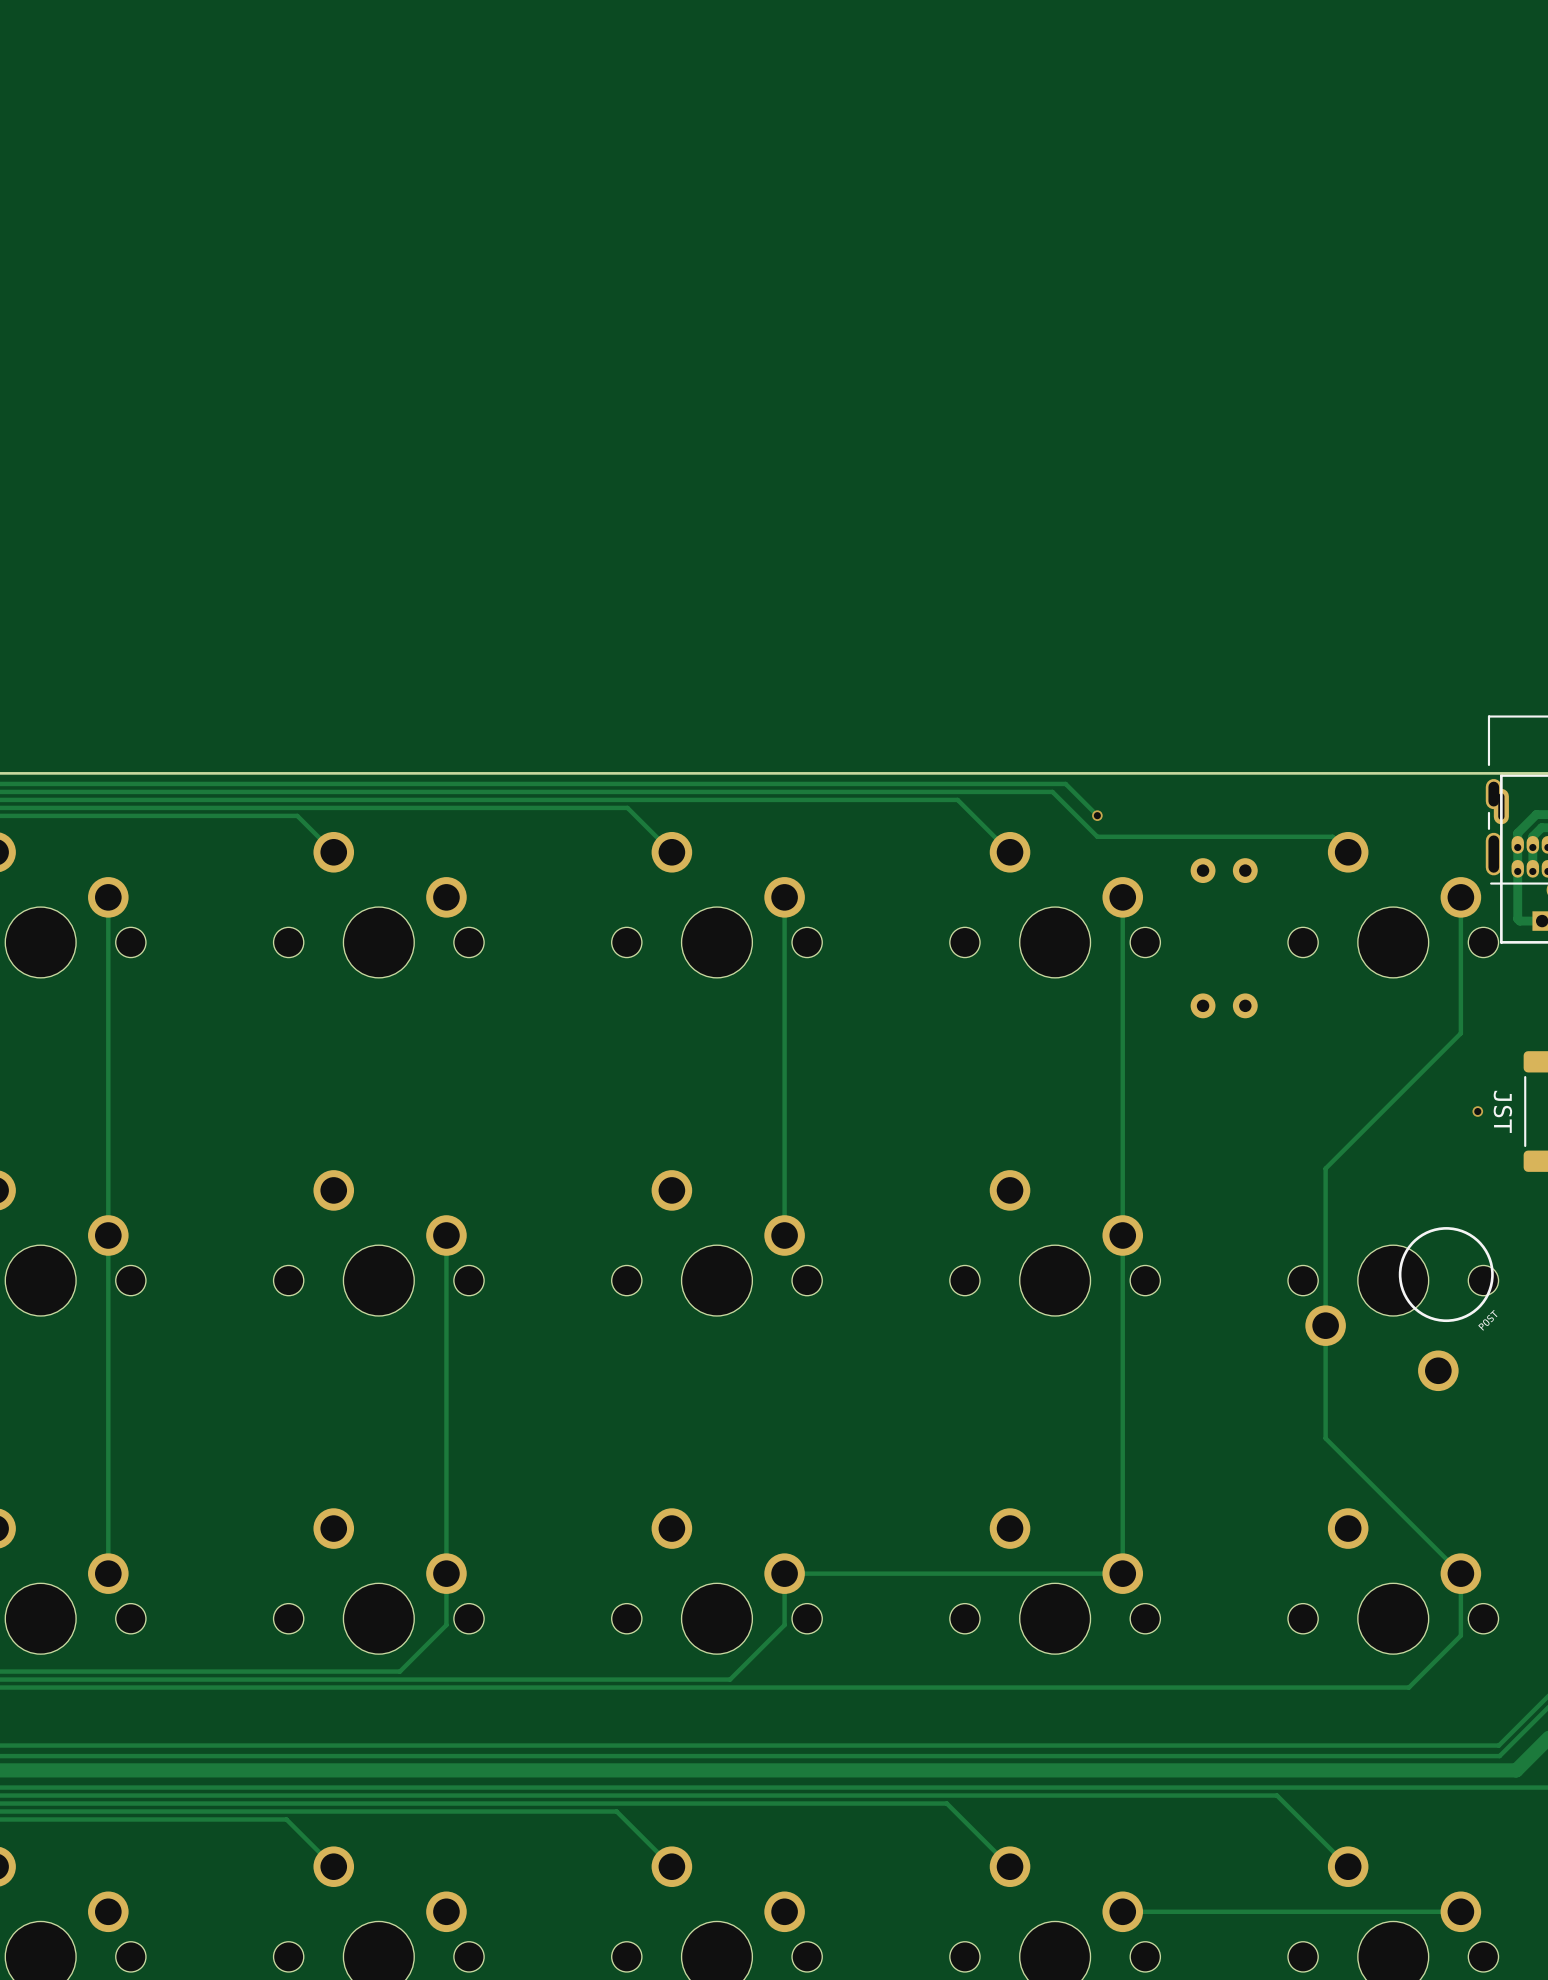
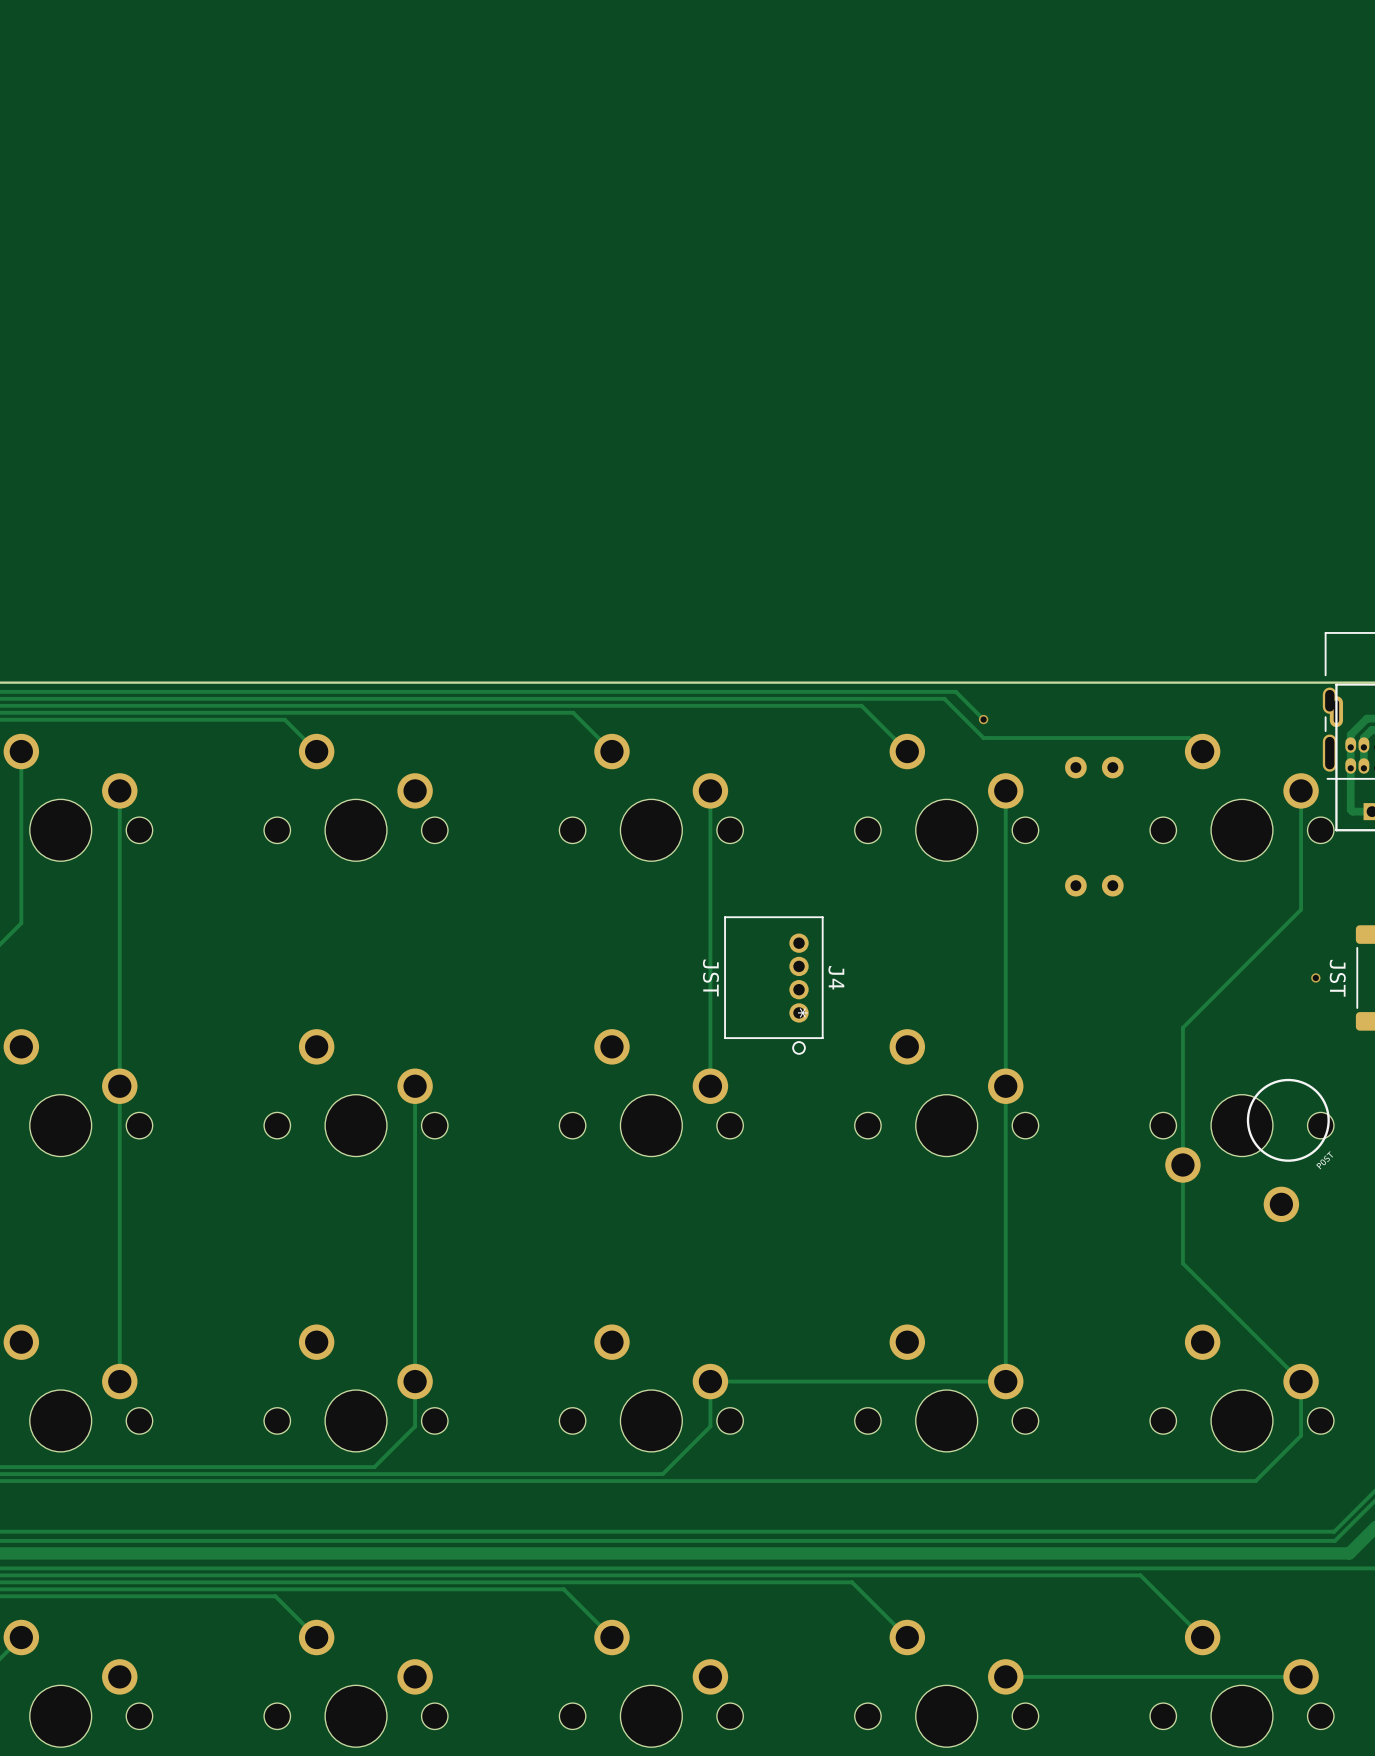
J4: none -> JST (773, 985)

